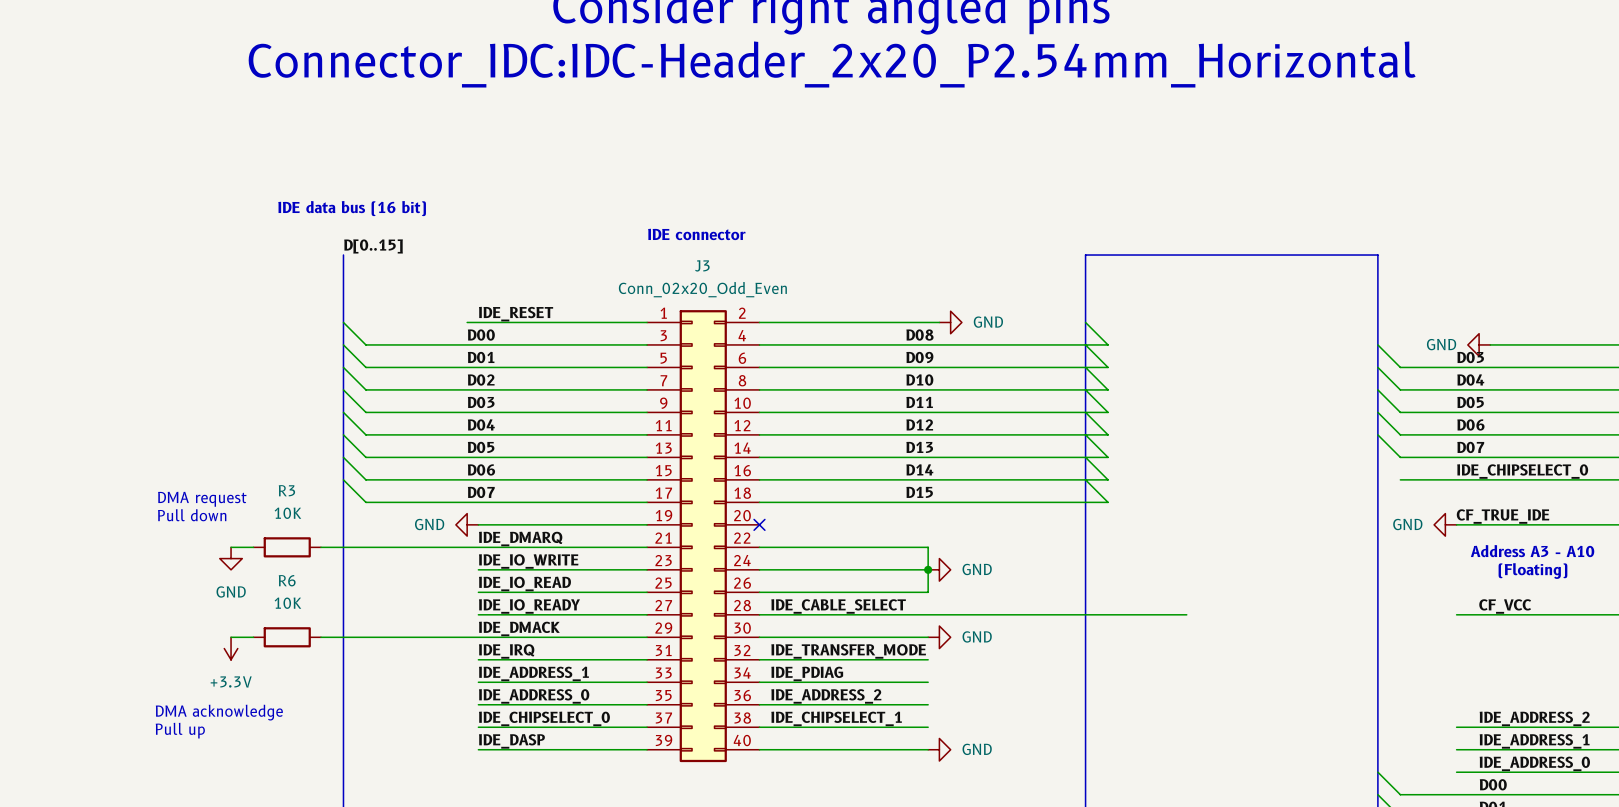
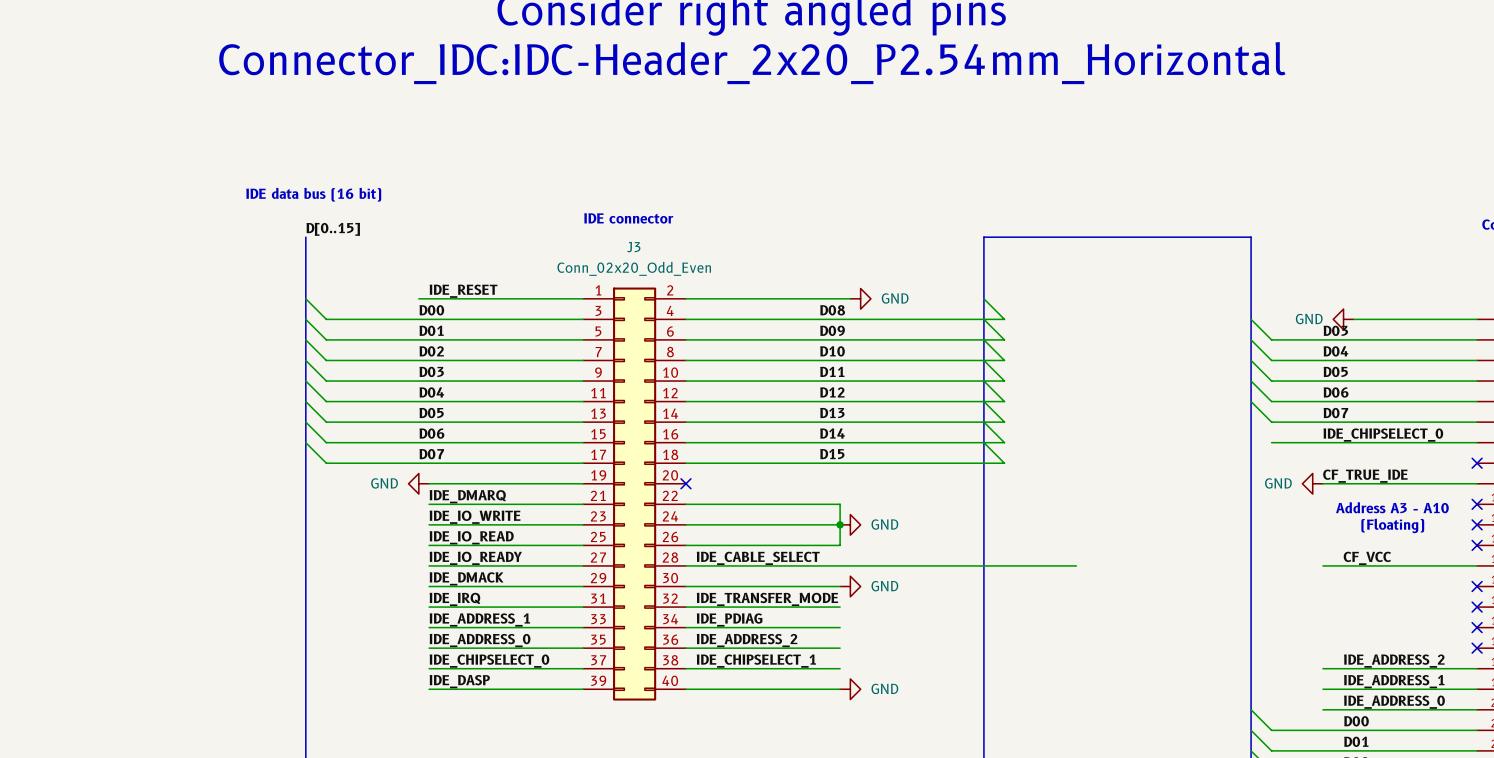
text: DMA request (202, 499) -> none
text: Pull down (192, 515) -> none
wire: (231, 547) (253, 547) -> none
R3: 10K (287, 547) -> none
wire: (320, 547) (478, 547) -> none
power symbol: GND (231, 558) -> none
wire: (231, 637) (253, 637) -> none
R6: 10K (287, 637) -> none
wire: (320, 637) (478, 637) -> none
power symbol: +3.3V (231, 648) -> none
text: DMA acknowledge (219, 712) -> none
text: Pull up (180, 730) -> none

